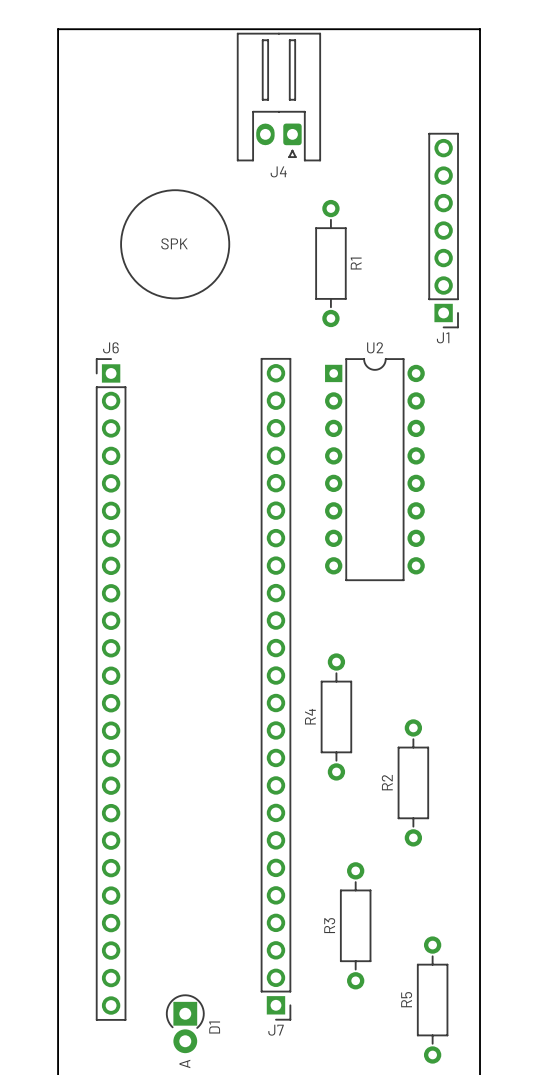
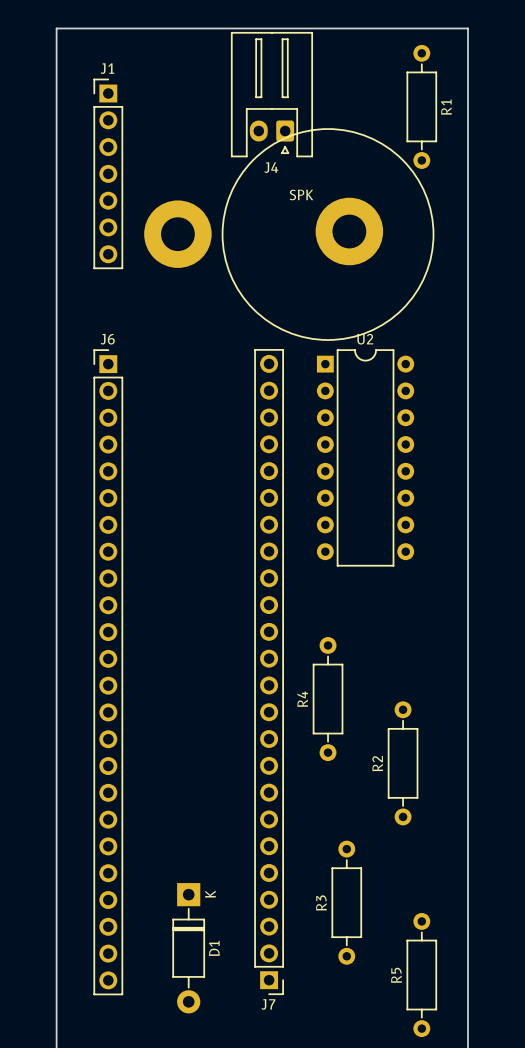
drawing: none -> [221, 128, 435, 341]
drawing: [120, 189, 230, 300] -> none
J1 rotation: 0° (443, 230) -> 180° (108, 173)
J1 position: (443, 230) -> (108, 173)
part: none -> (349, 231)
part: none -> (177, 234)
text position: SPK (174, 243) -> SPK (301, 194)
R1 position: (330, 263) -> (421, 106)
D1 footprint: [166, 994, 205, 1054] -> [172, 883, 205, 1014]

